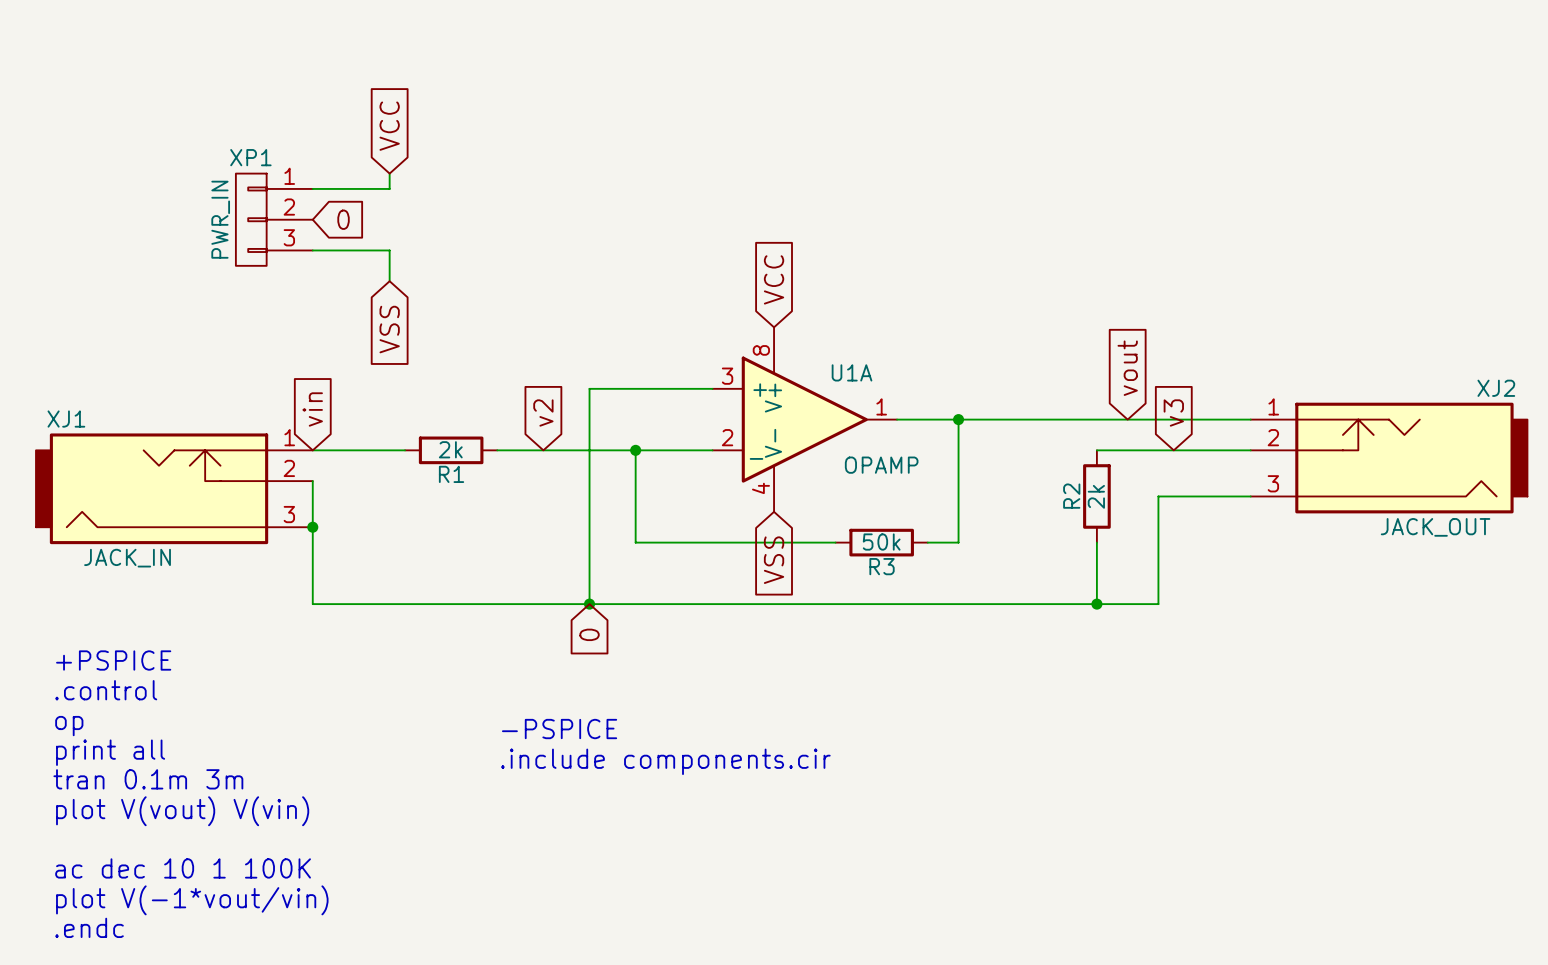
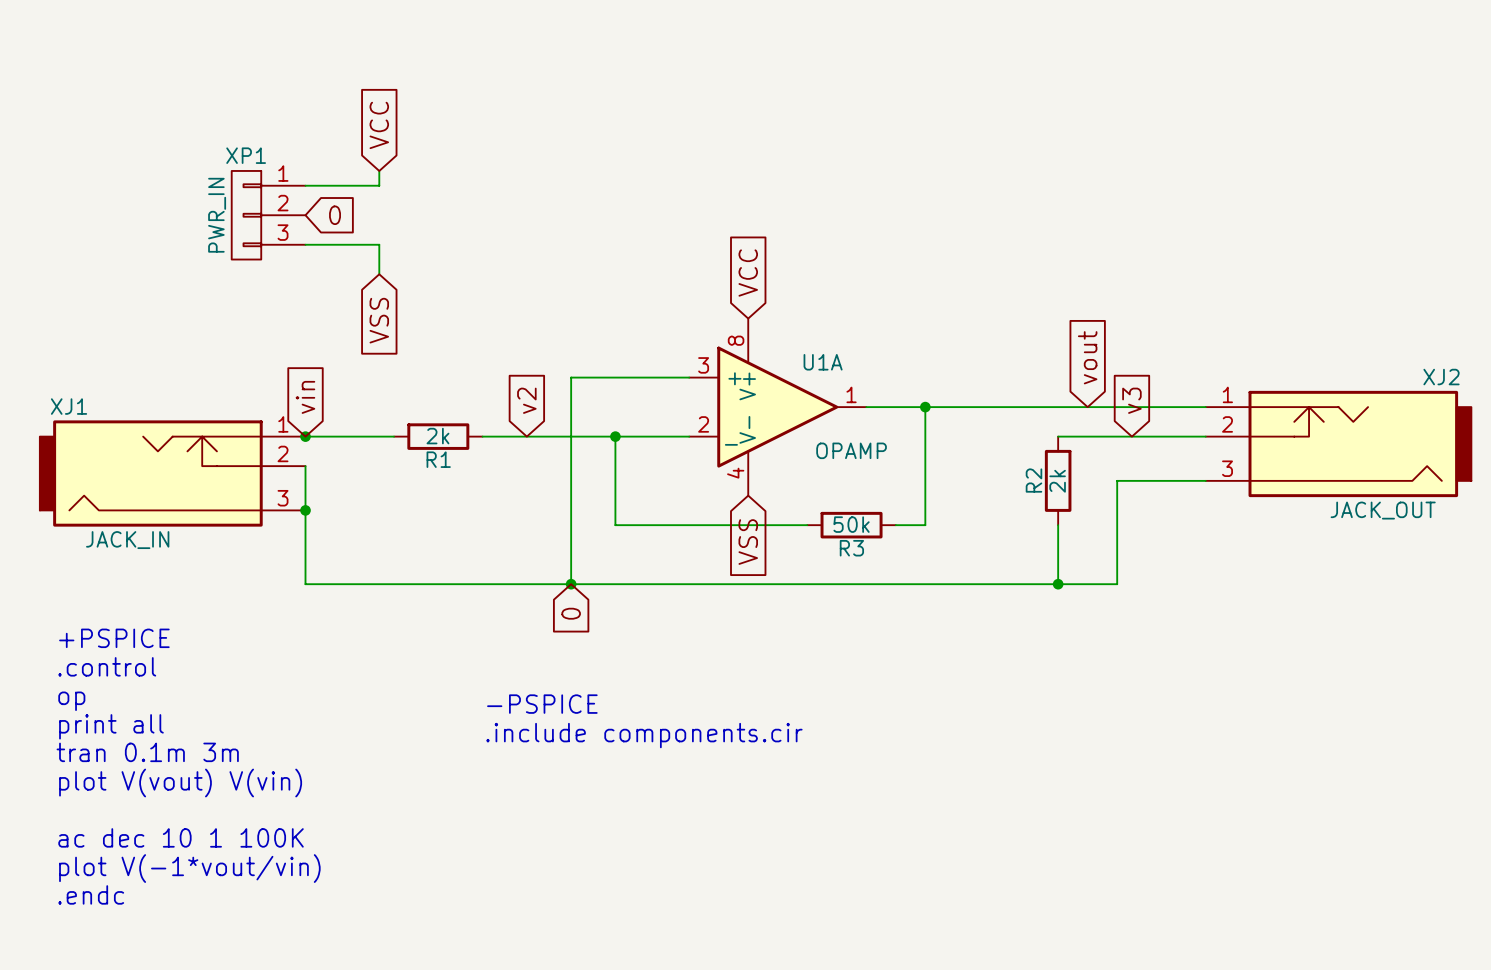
junction: none -> (305, 436)

